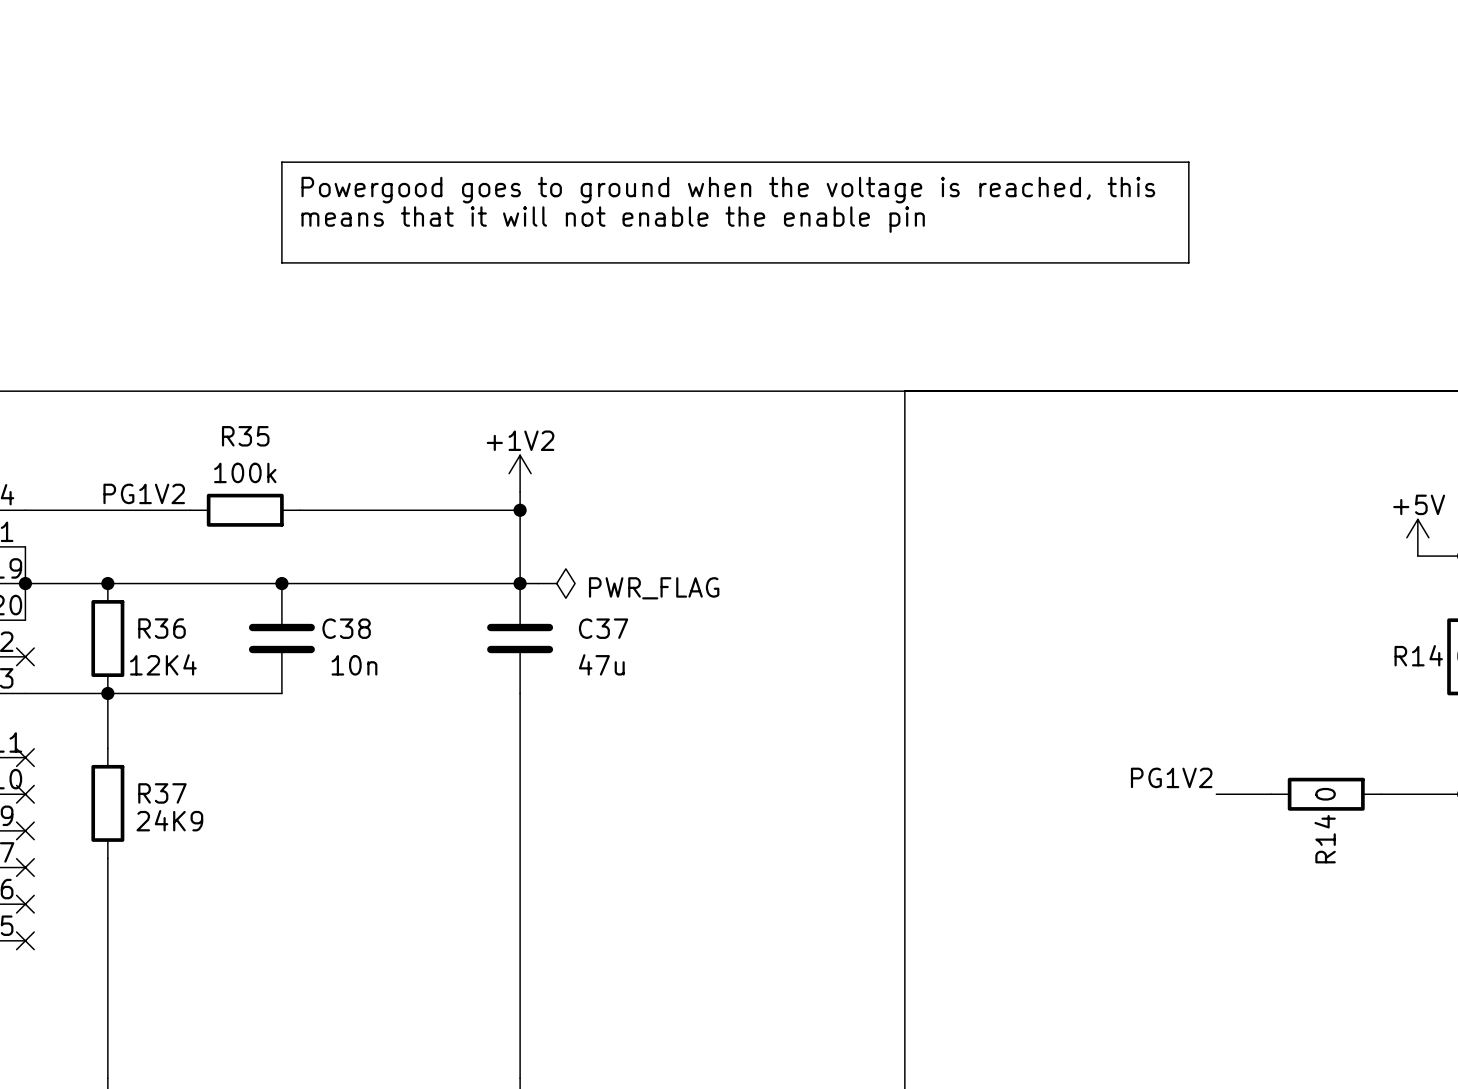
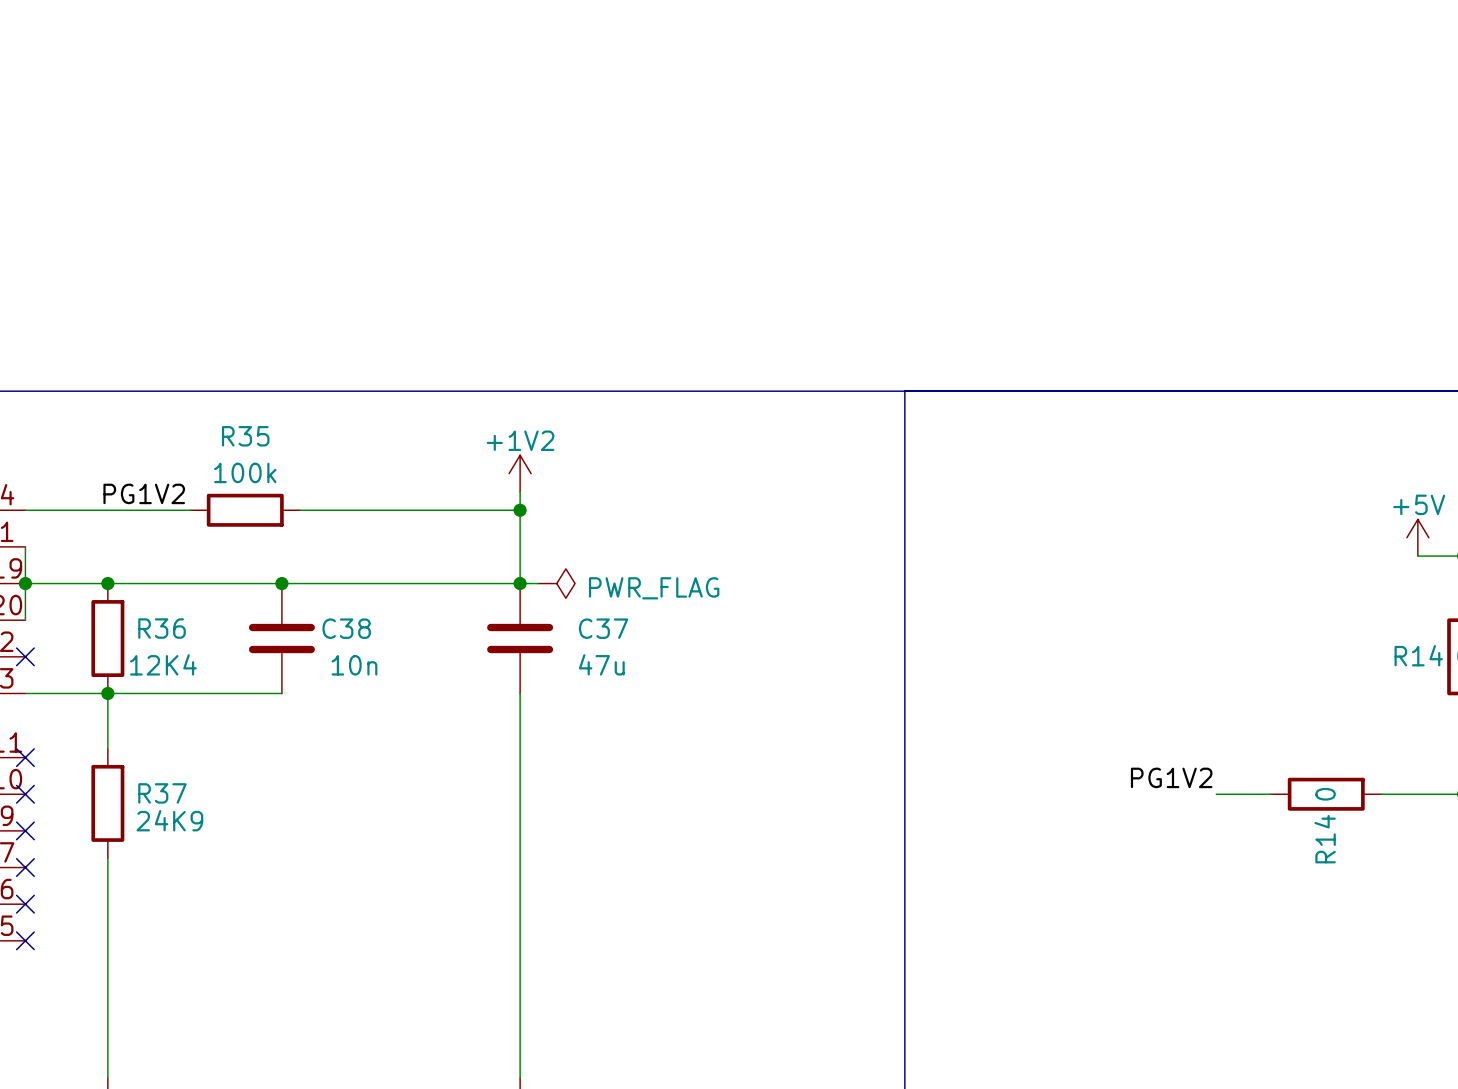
line: (281, 162) (1188, 162) (1188, 262) (281, 262) (281, 162) -> none
text: Powergood goes to ground when the voltage is reached, this (728, 190) -> none
text: means that it will not enable the enable pin (613, 219) -> none

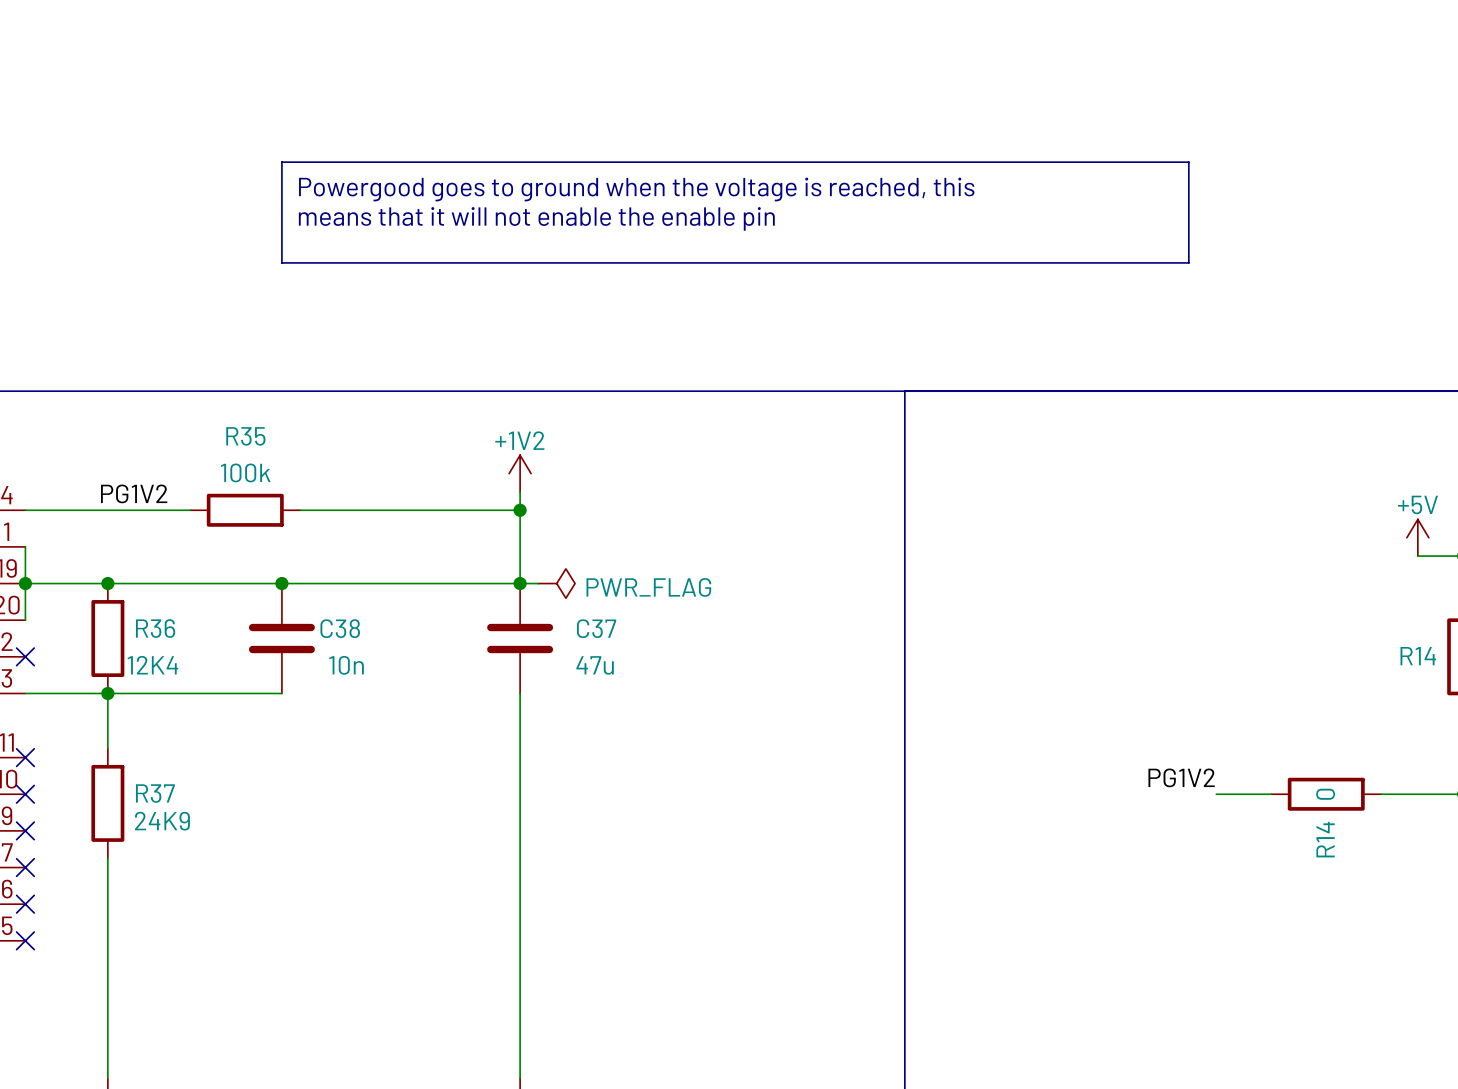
line: none -> (281, 162) (1188, 162) (1188, 262) (281, 262) (281, 162)
text: none -> Powergood goes to ground when the voltage is reached, this (636, 189)
text: none -> means that it will not enable the enable pin (536, 218)

